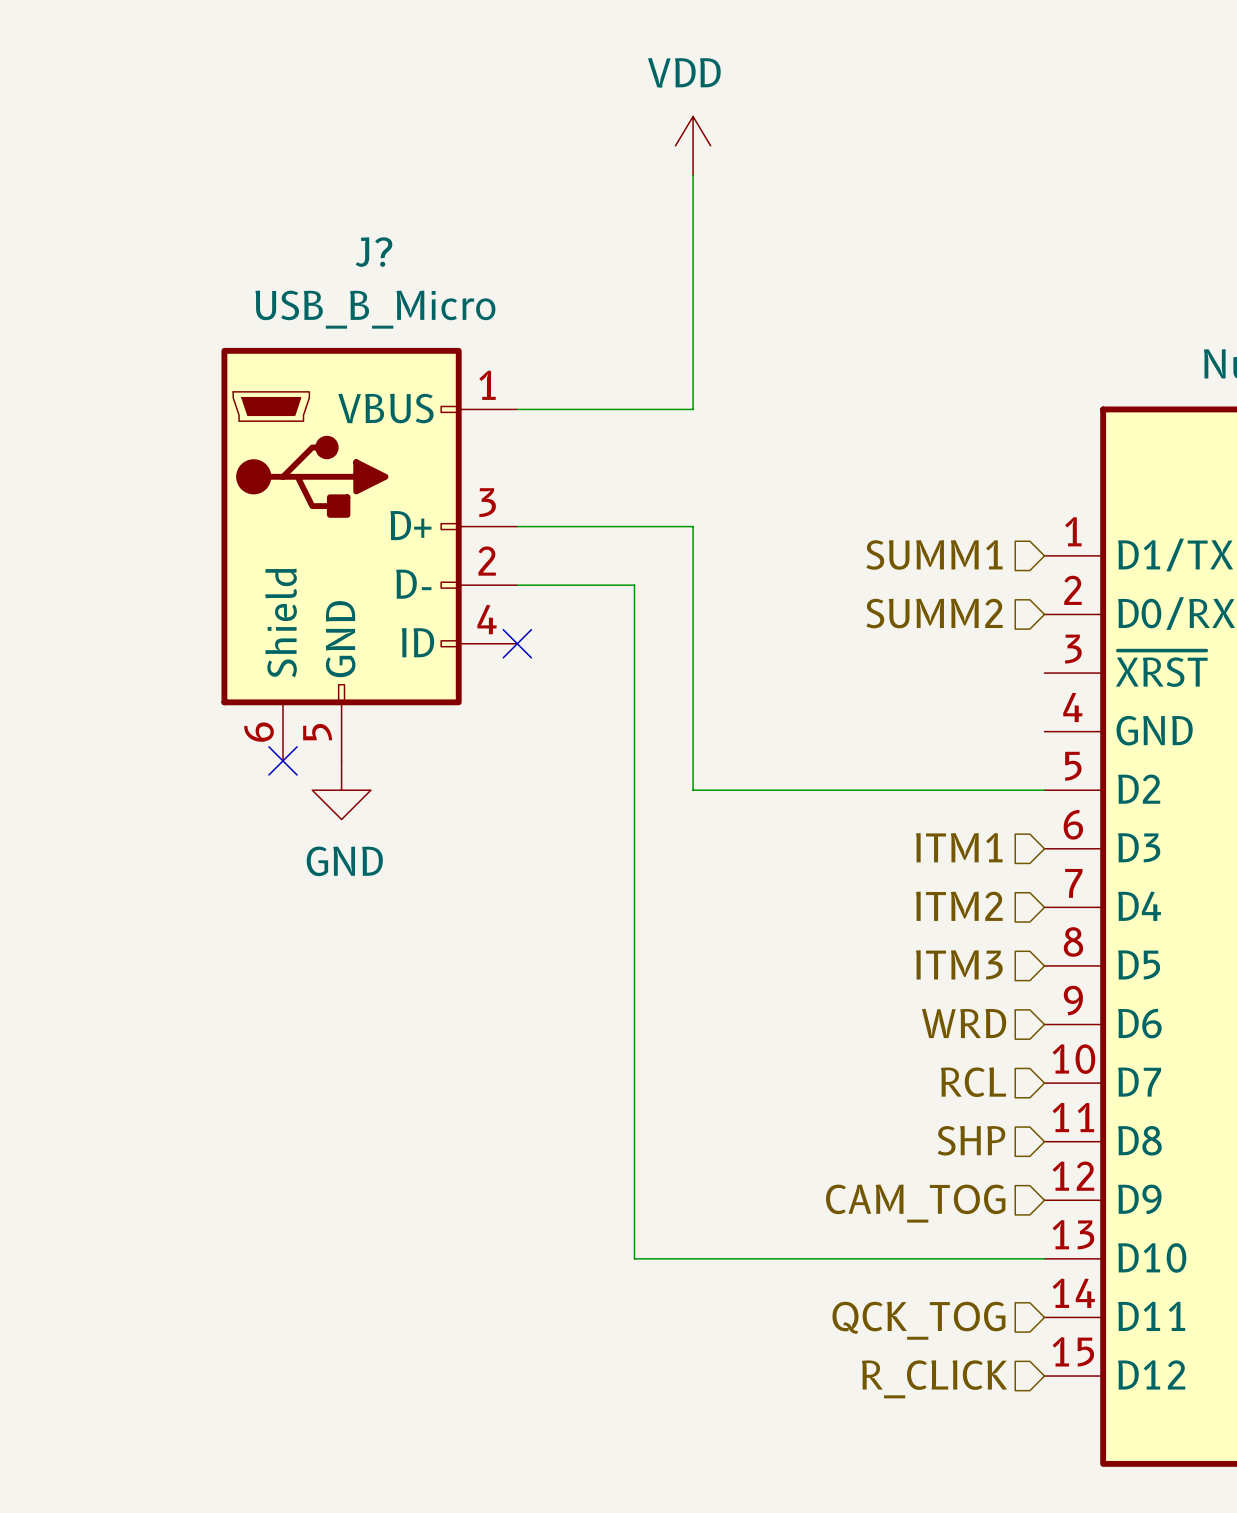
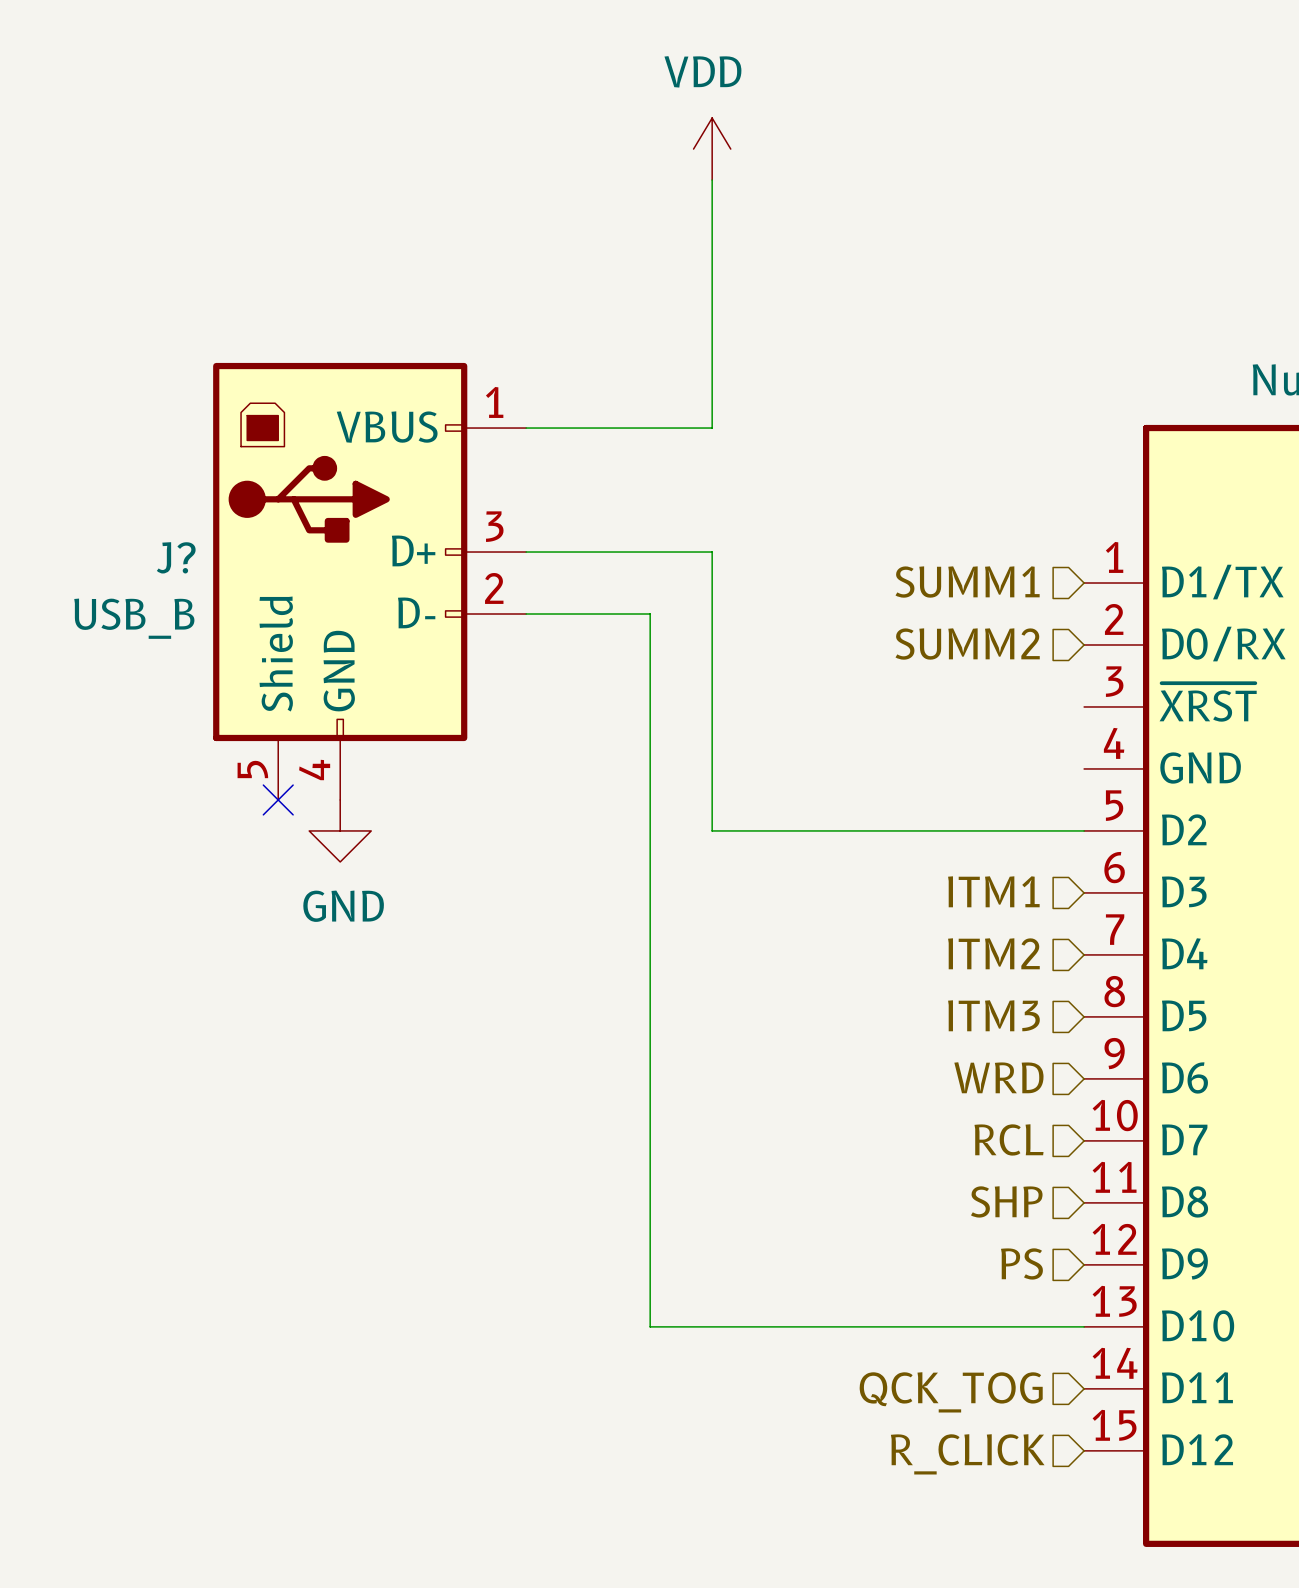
J? name position: J? (374, 252) -> J? (176, 557)
J? value: USB_B_Micro (375, 309) -> USB_B (134, 618)
J? symbol: [221, 347, 518, 761] -> [213, 362, 527, 800]
no-connect mark: (517, 643) -> none
hierarchical label: CAM_TOG (915, 1203) -> PS (1021, 1263)

